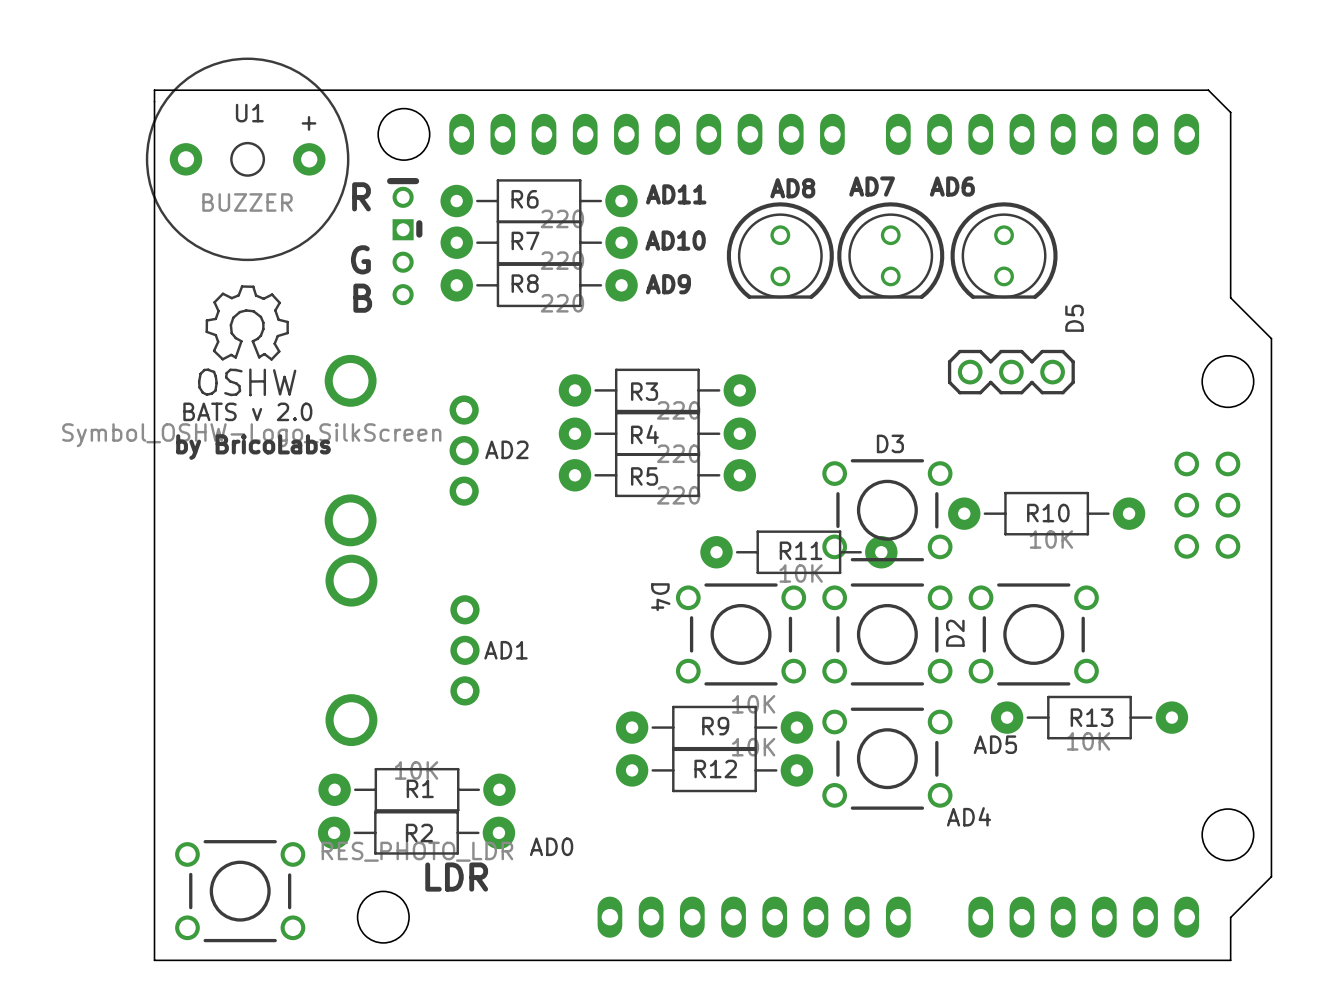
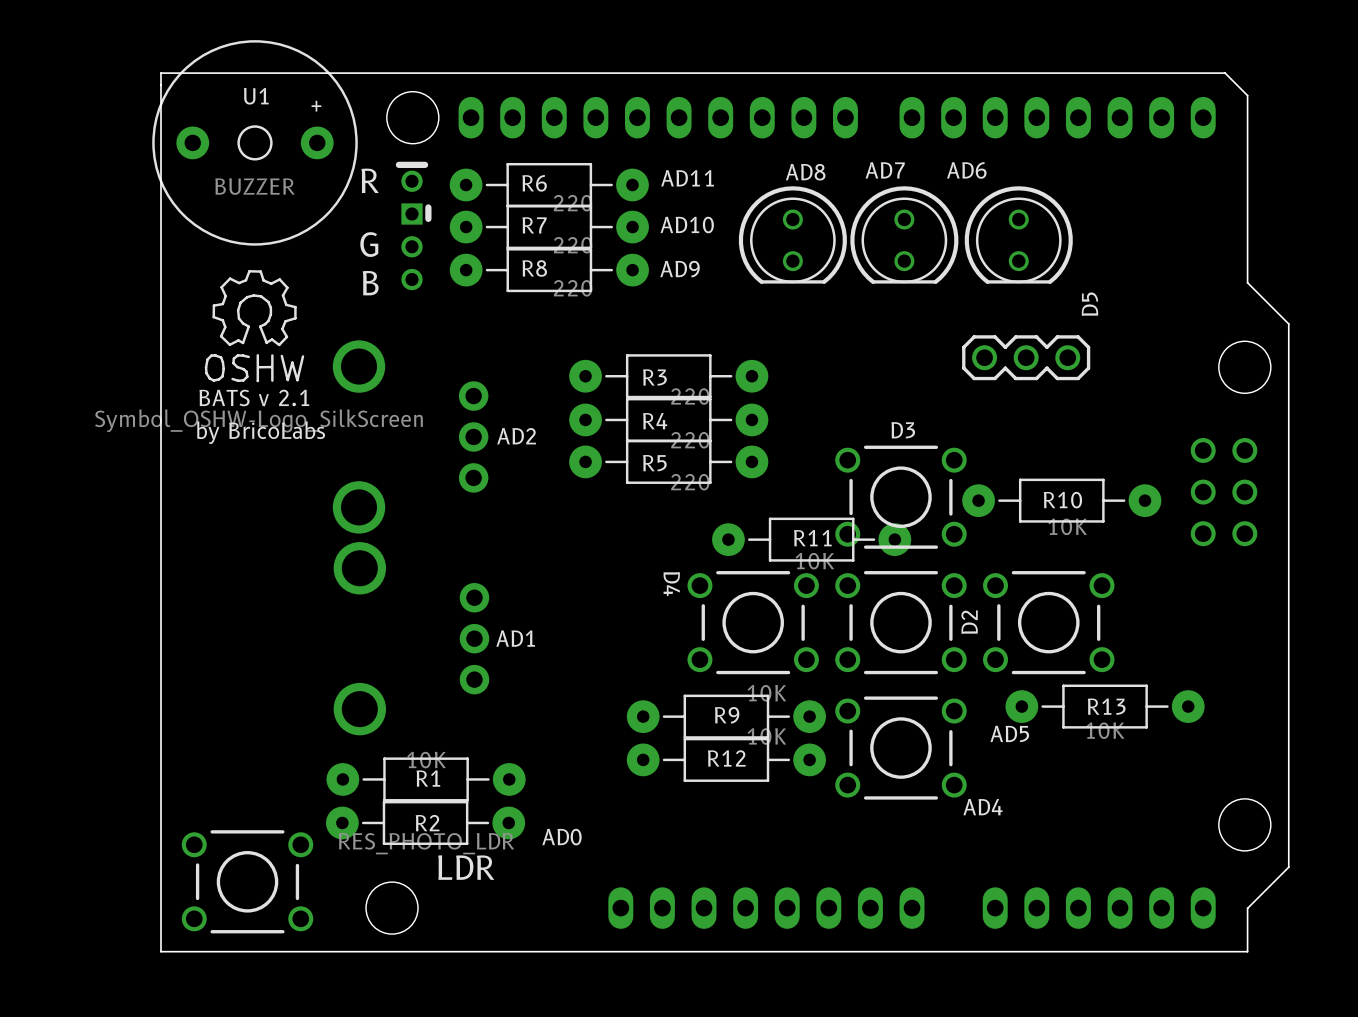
BATS v 2.0 name: BATS v 2.0 (247, 411) -> BATS v 2.1 (254, 397)

